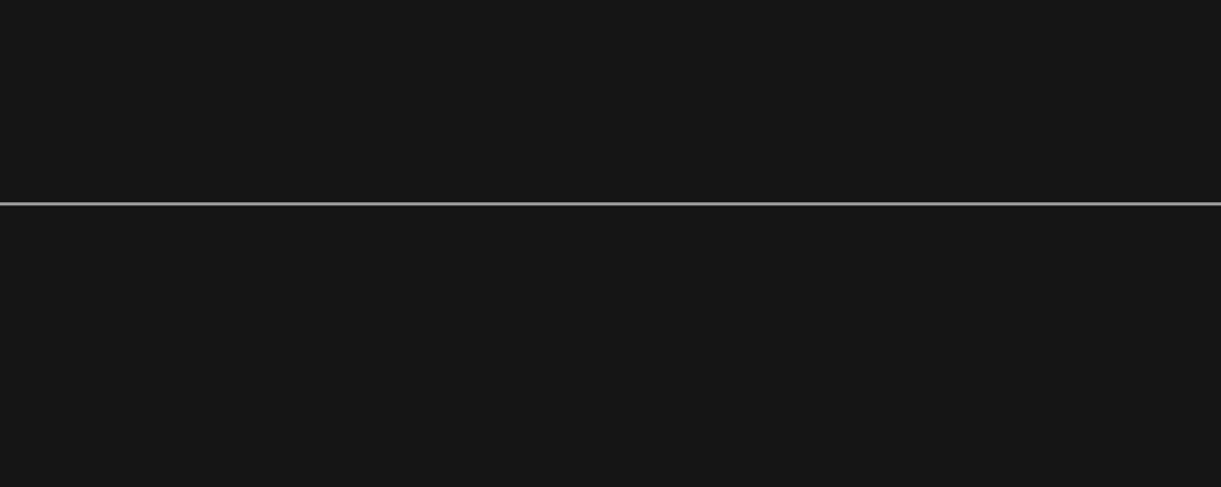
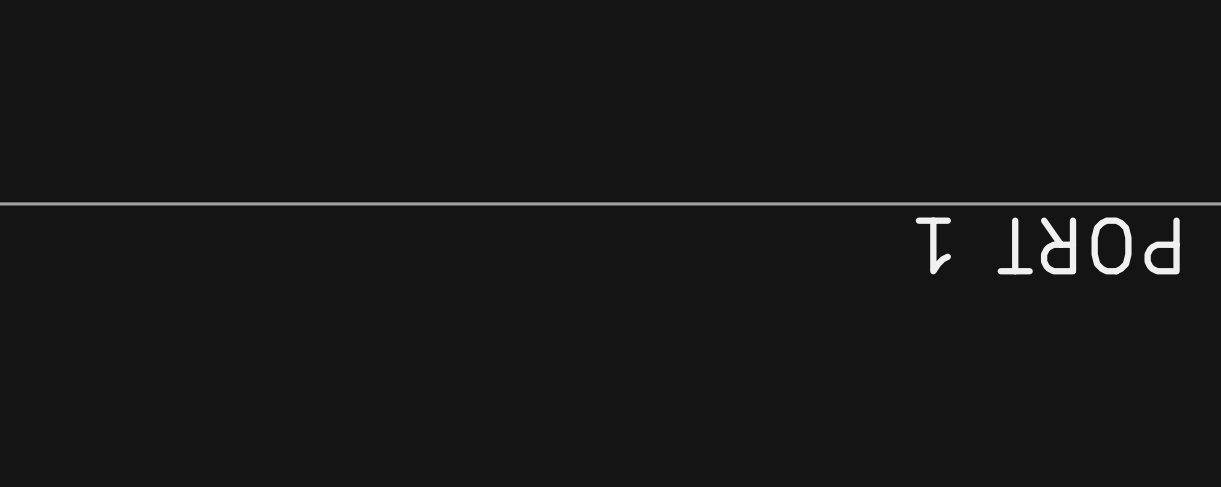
text: none -> PORT 1 (1047, 245)

